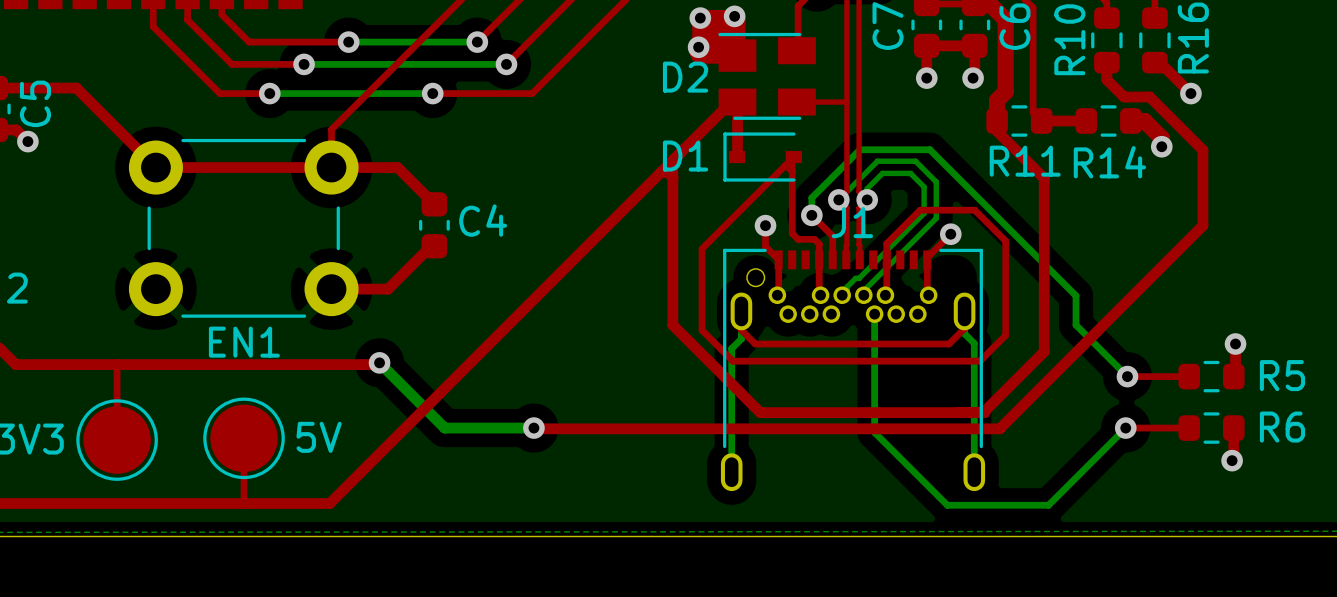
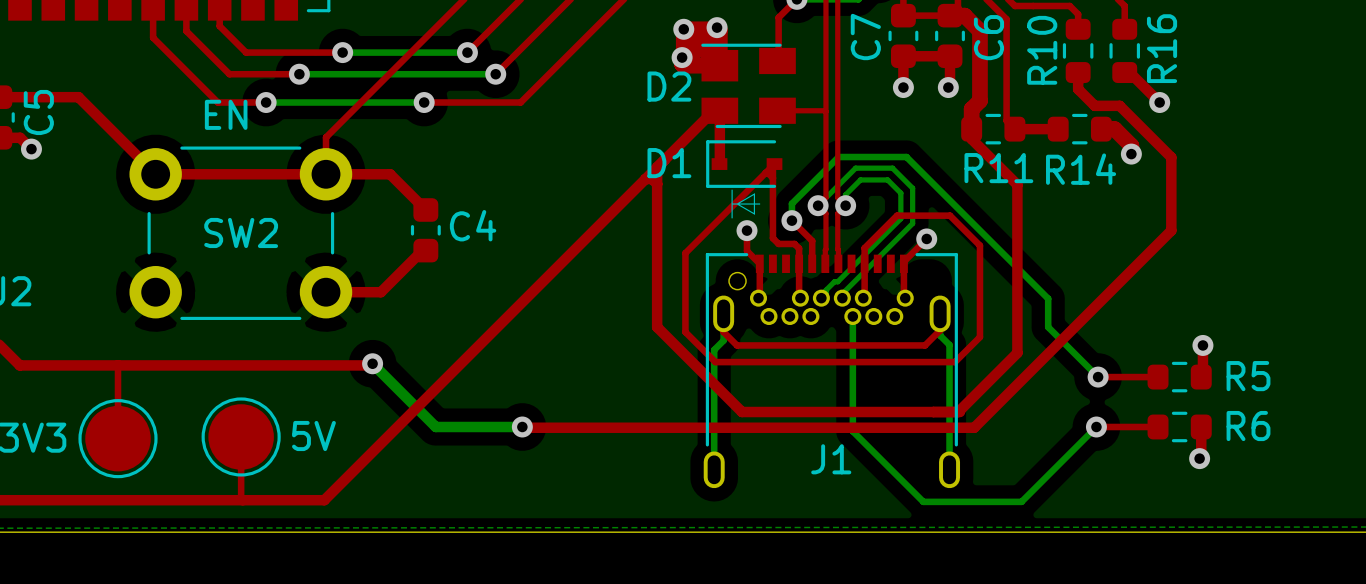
EN1 value: none -> EN (226, 114)
text: none -> ⏄ (745, 204)
J1 name position: J1 (852, 222) -> J1 (831, 459)
EN1 name: EN1 (244, 342) -> SW2 (241, 232)

